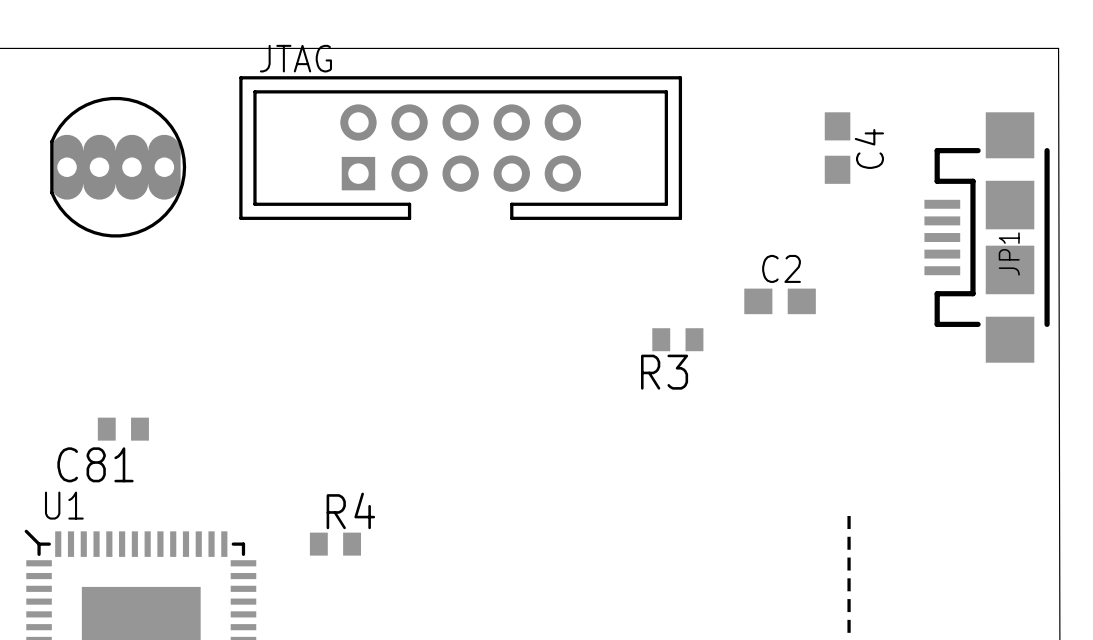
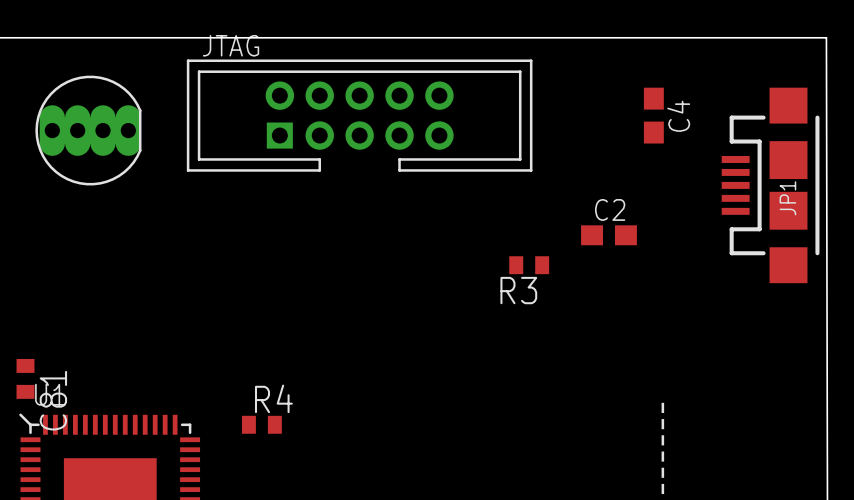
part rotation: 0° (118, 167) -> 180° (88, 130)
C81 rotation: 0° (123, 429) -> 90° clockwise (25, 378)
C81 position: (123, 429) -> (25, 378)
C81 name position: C81 (95, 464) -> C81 (53, 400)

